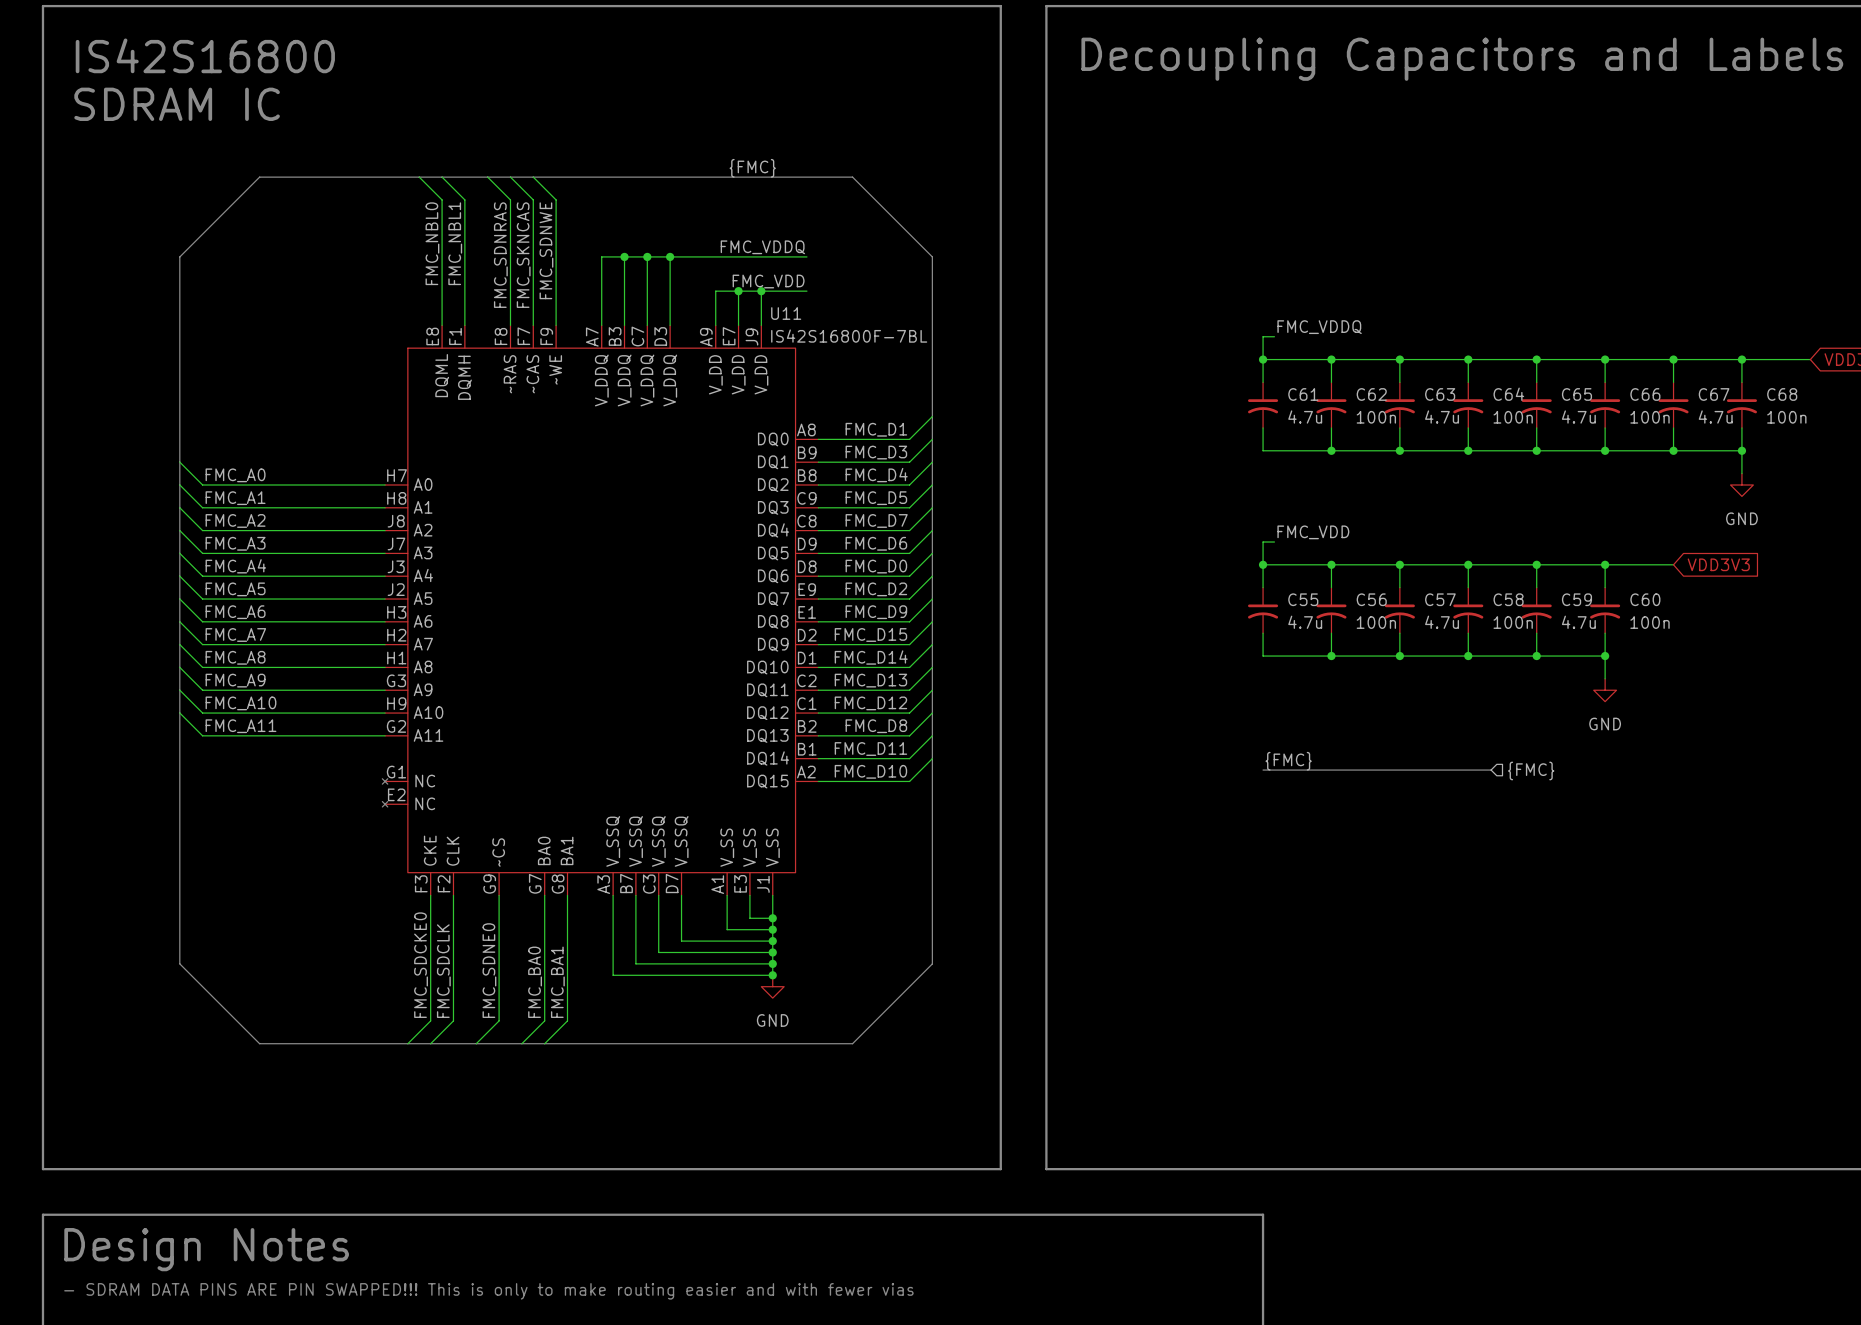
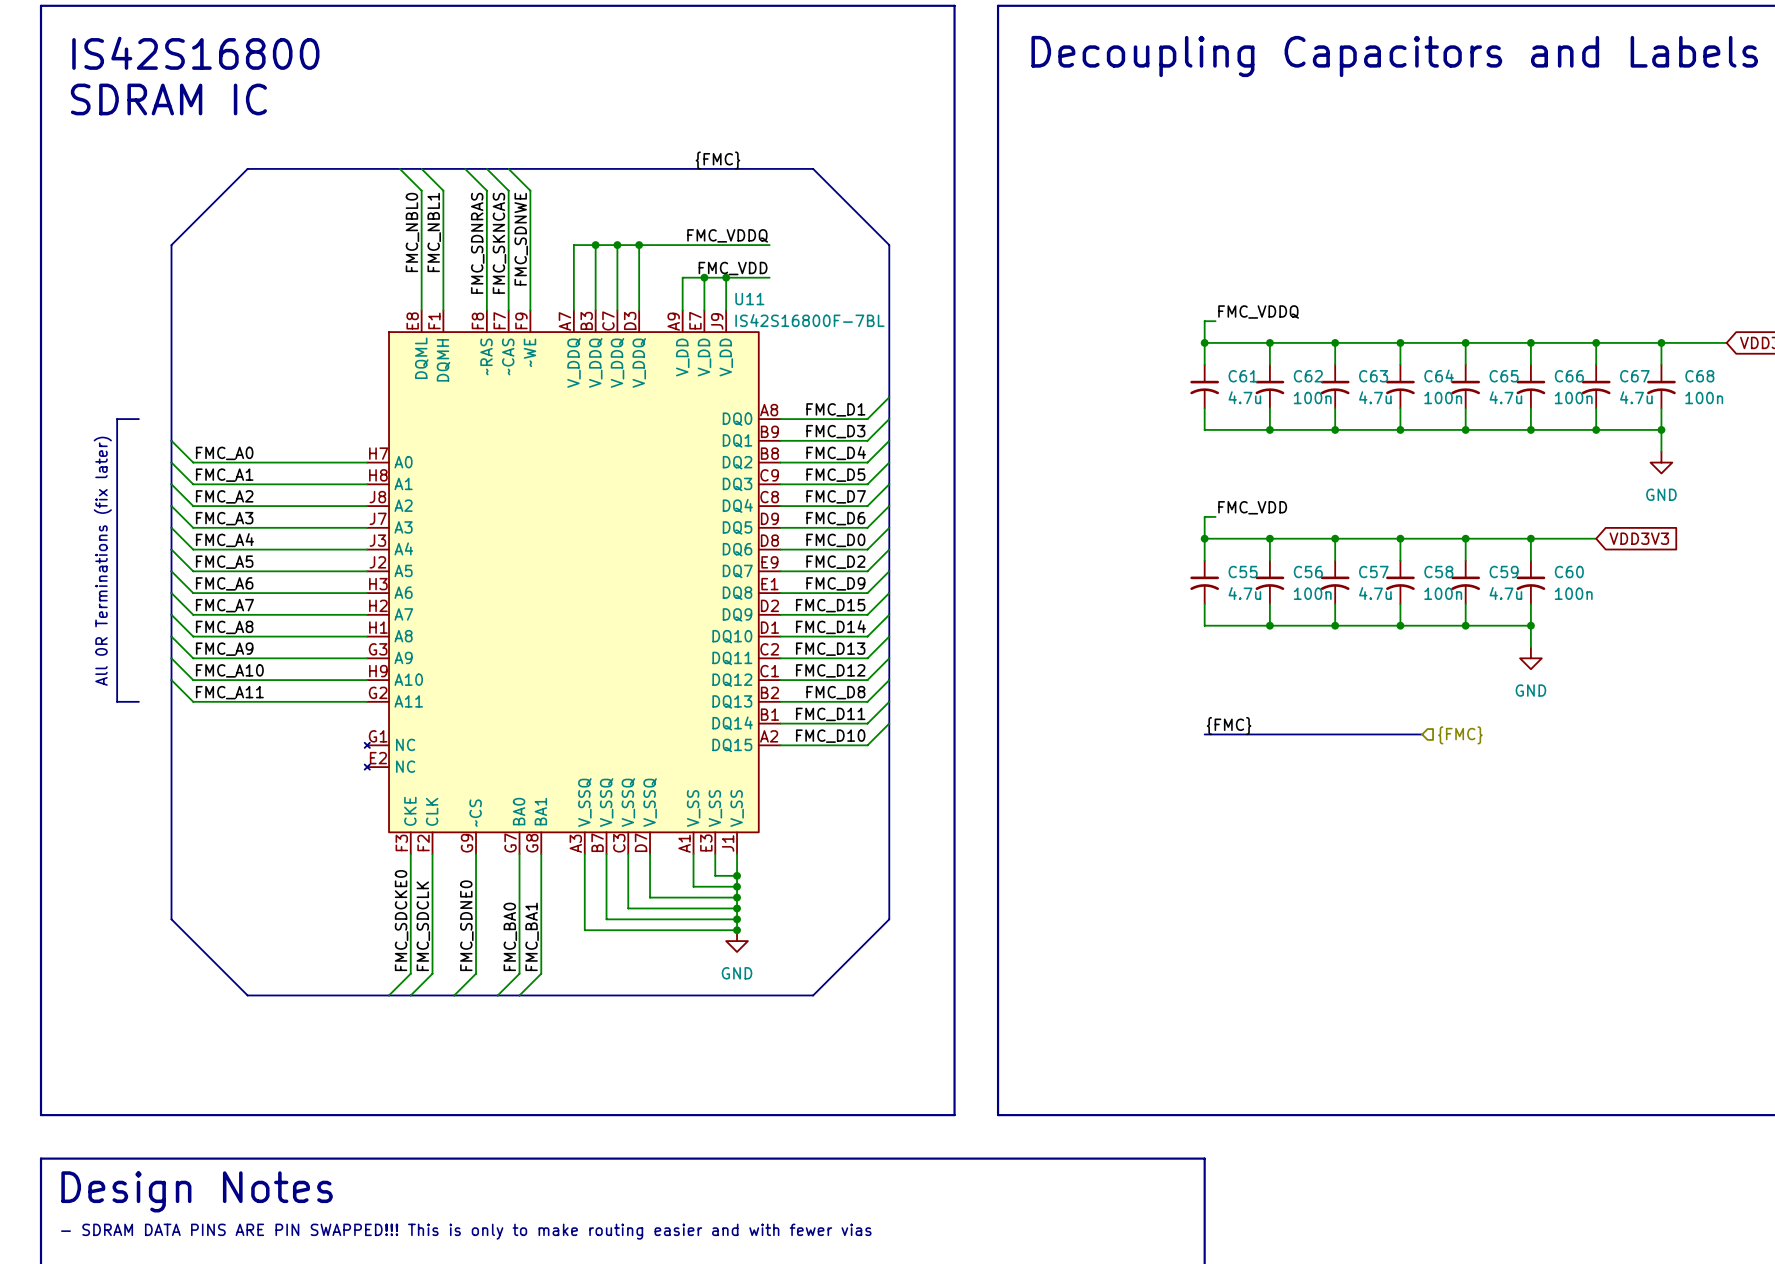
line: none -> (138, 419) (117, 419) (117, 701) (138, 701)
text: none -> All 0R Terminations (fix later) (102, 561)

